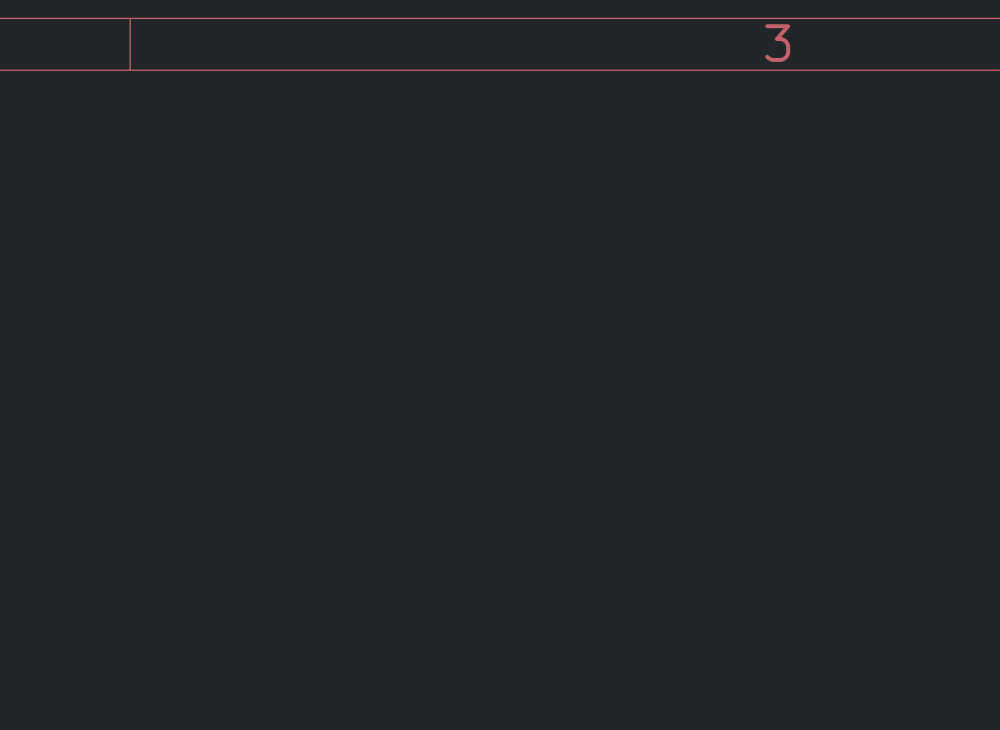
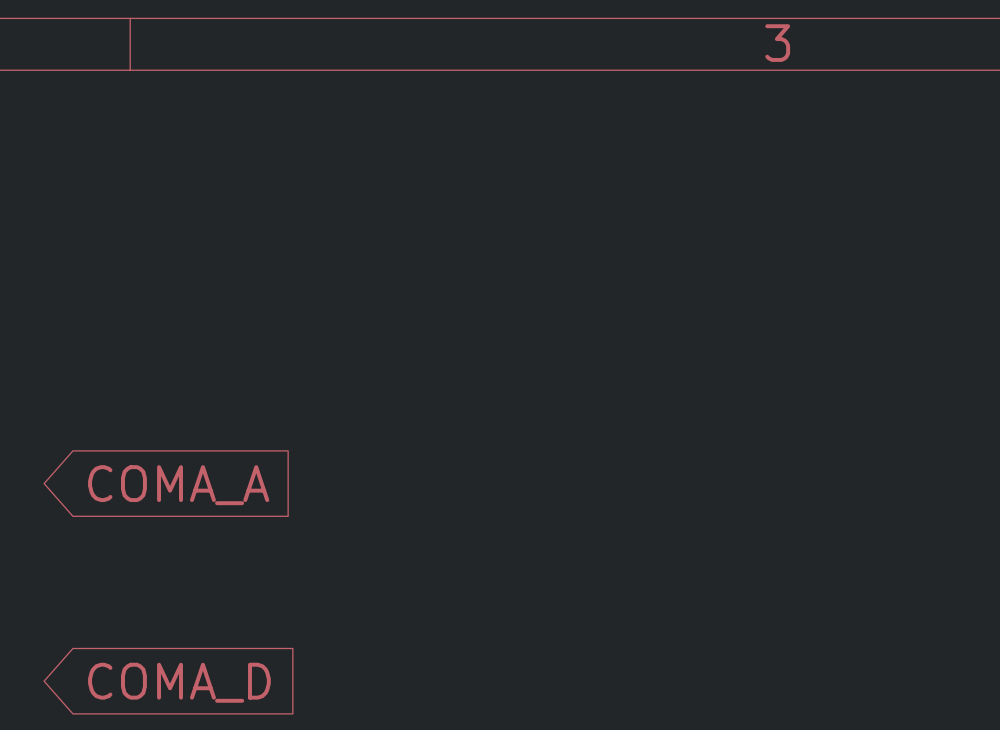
global label: none -> COMA_A (178, 485)
global label: none -> COMA_D (179, 682)

